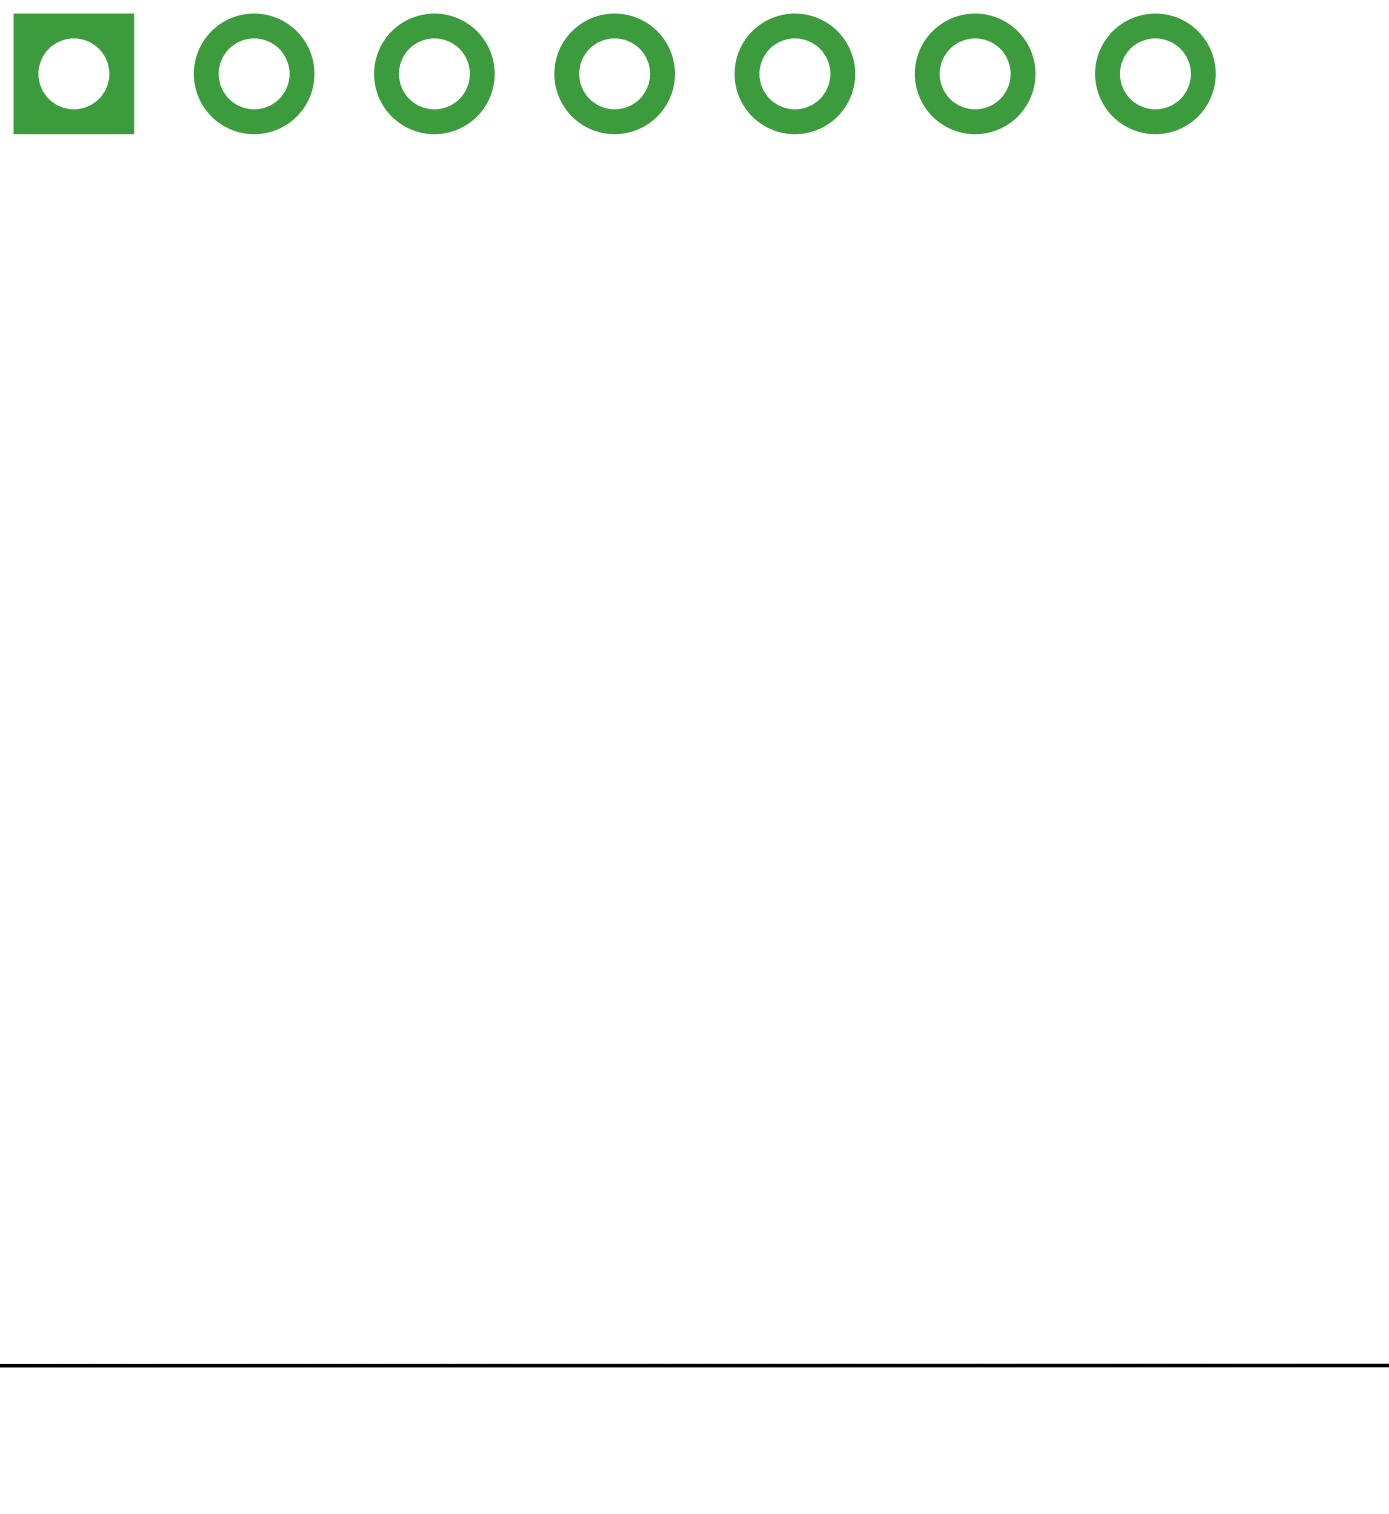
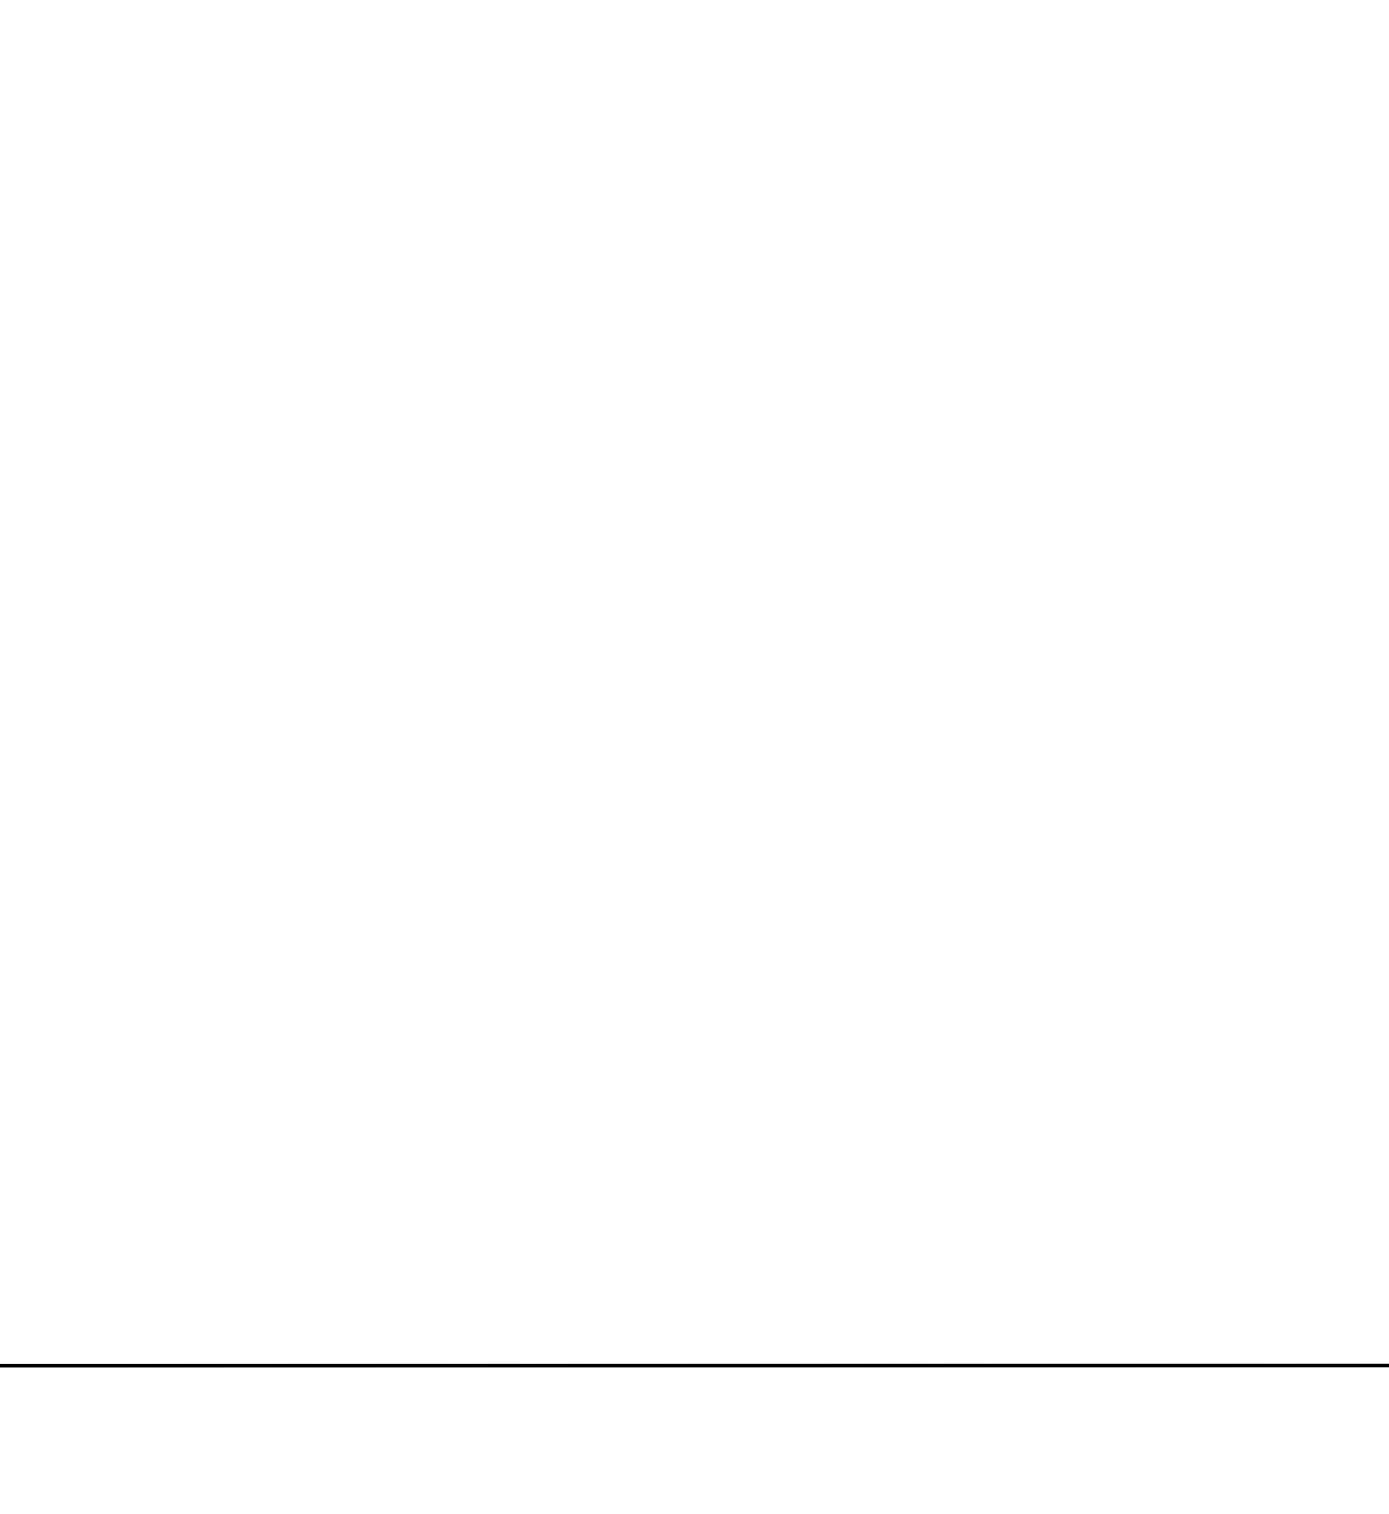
part: (614, 73) -> none

